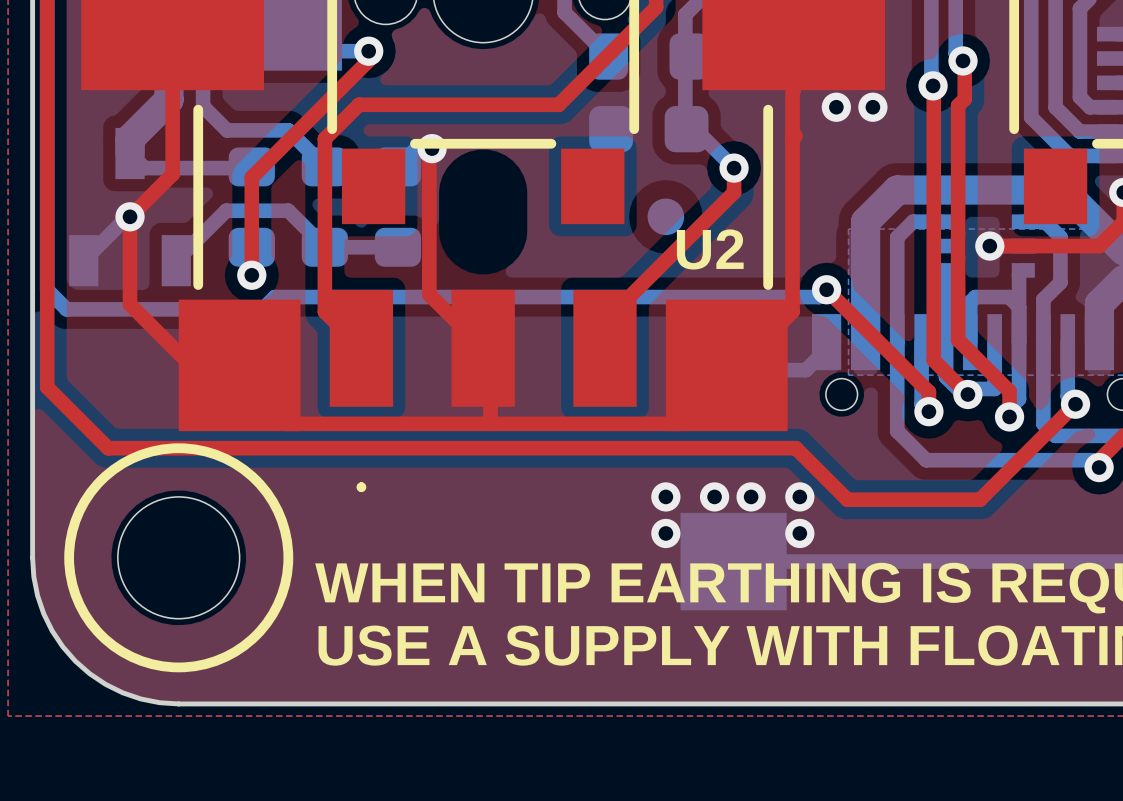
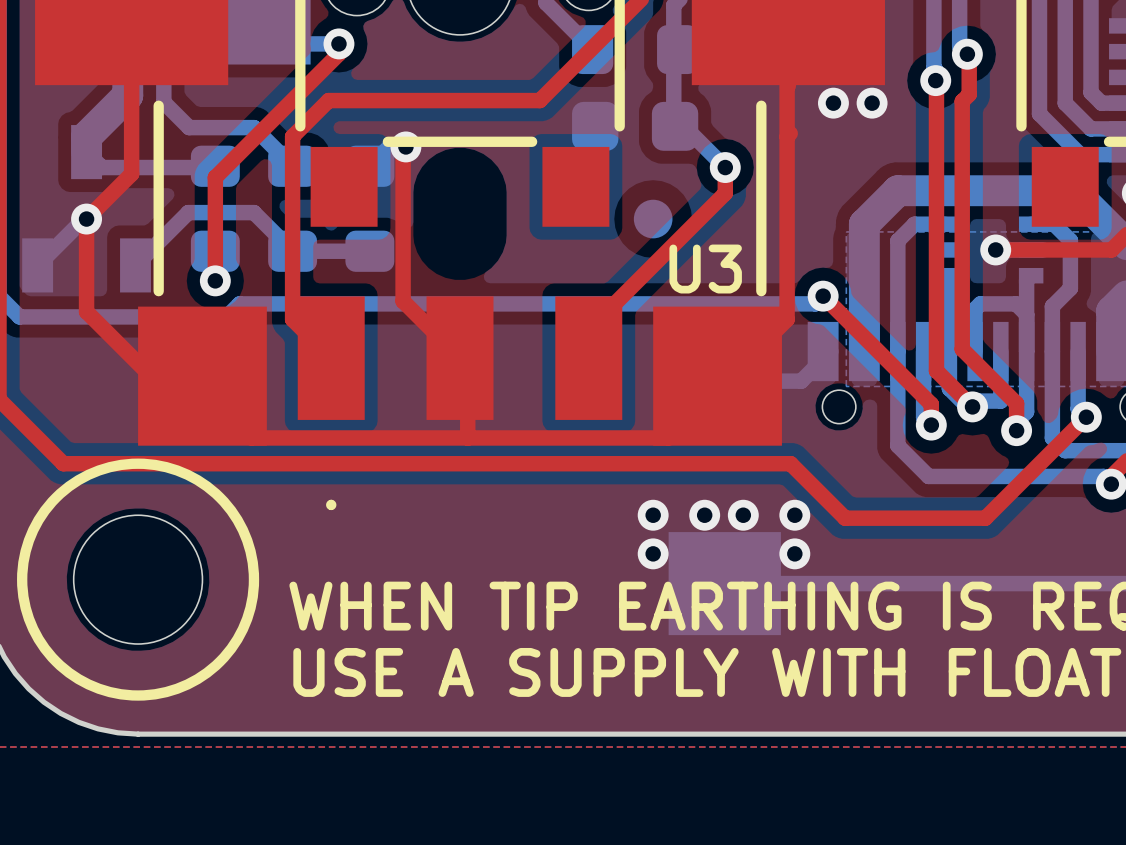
U2 name: U2 (710, 249) -> U3 (705, 269)

